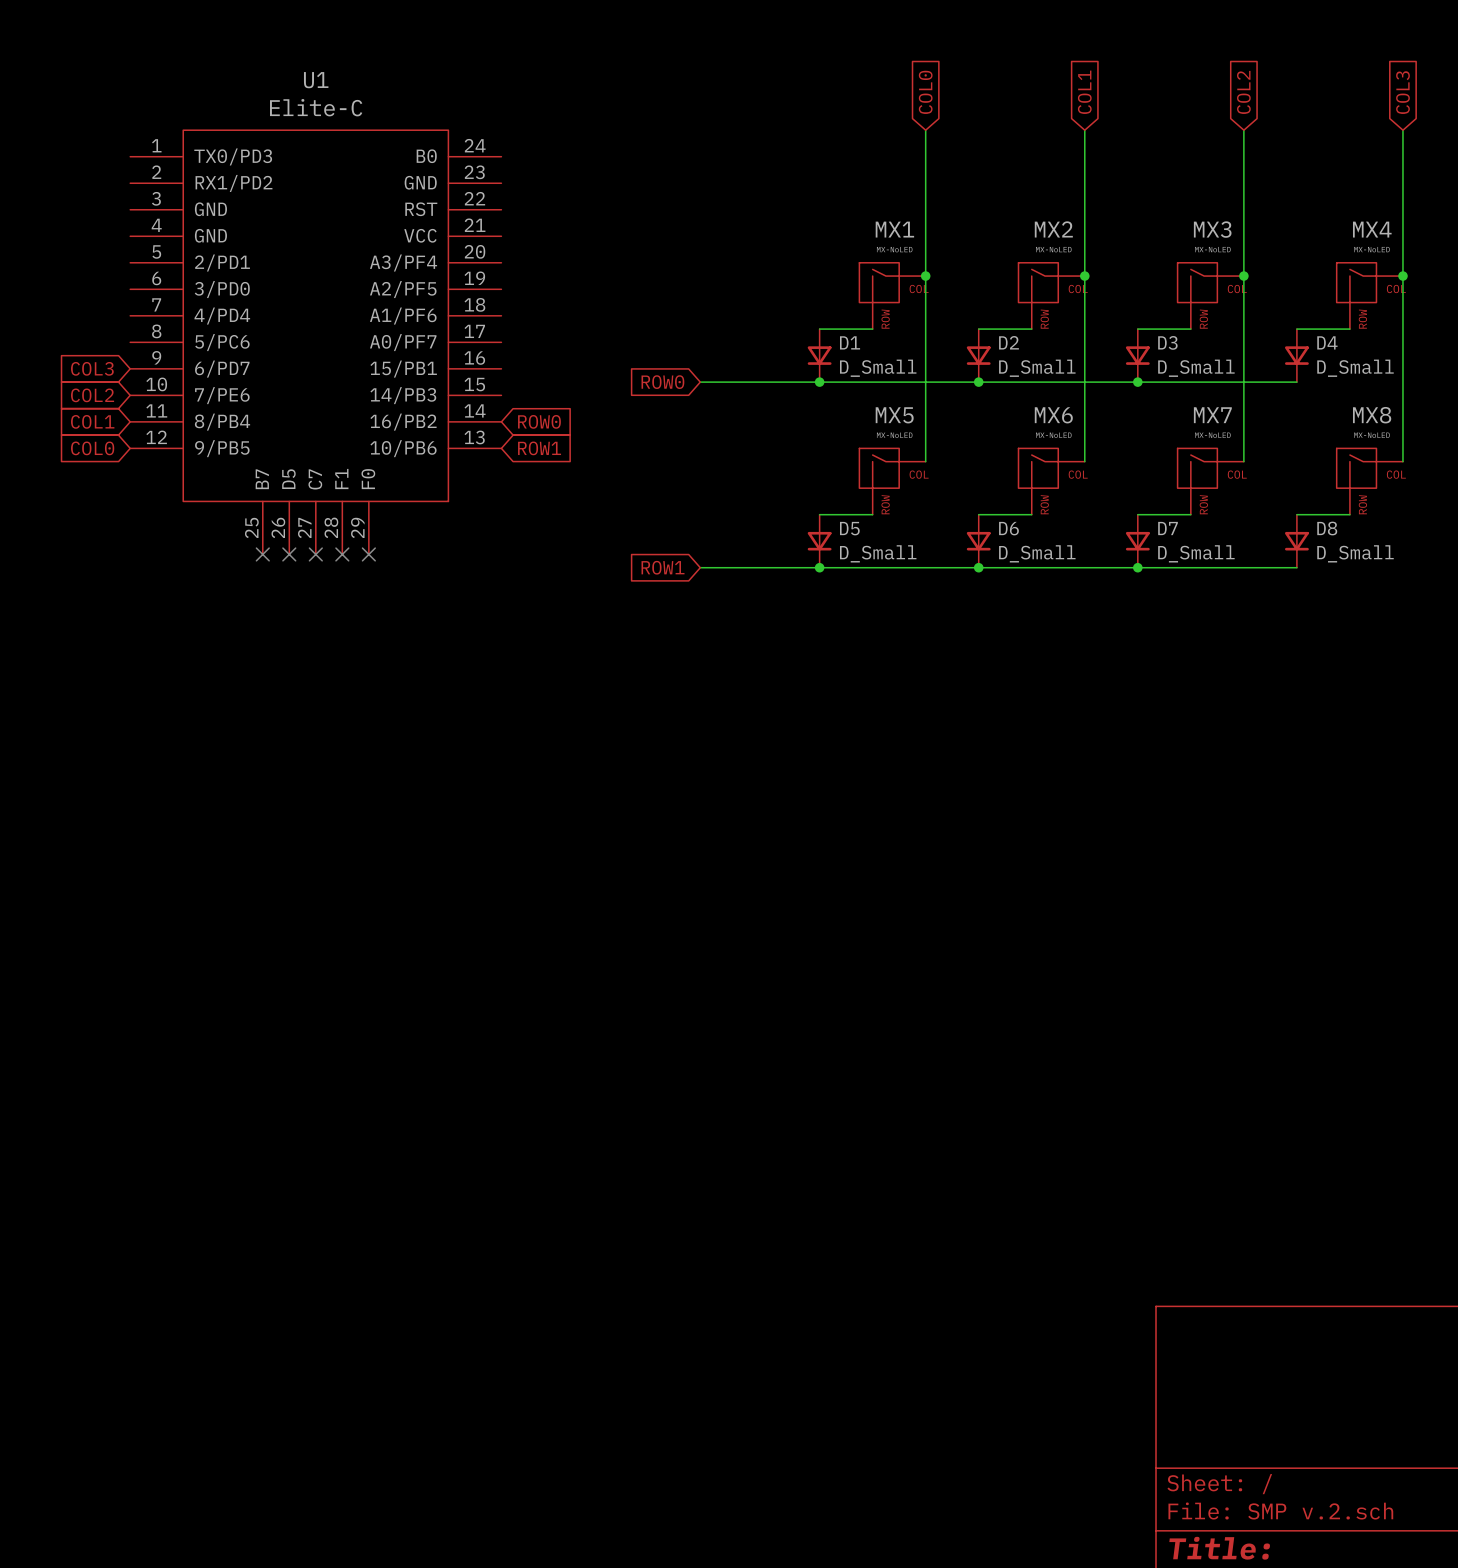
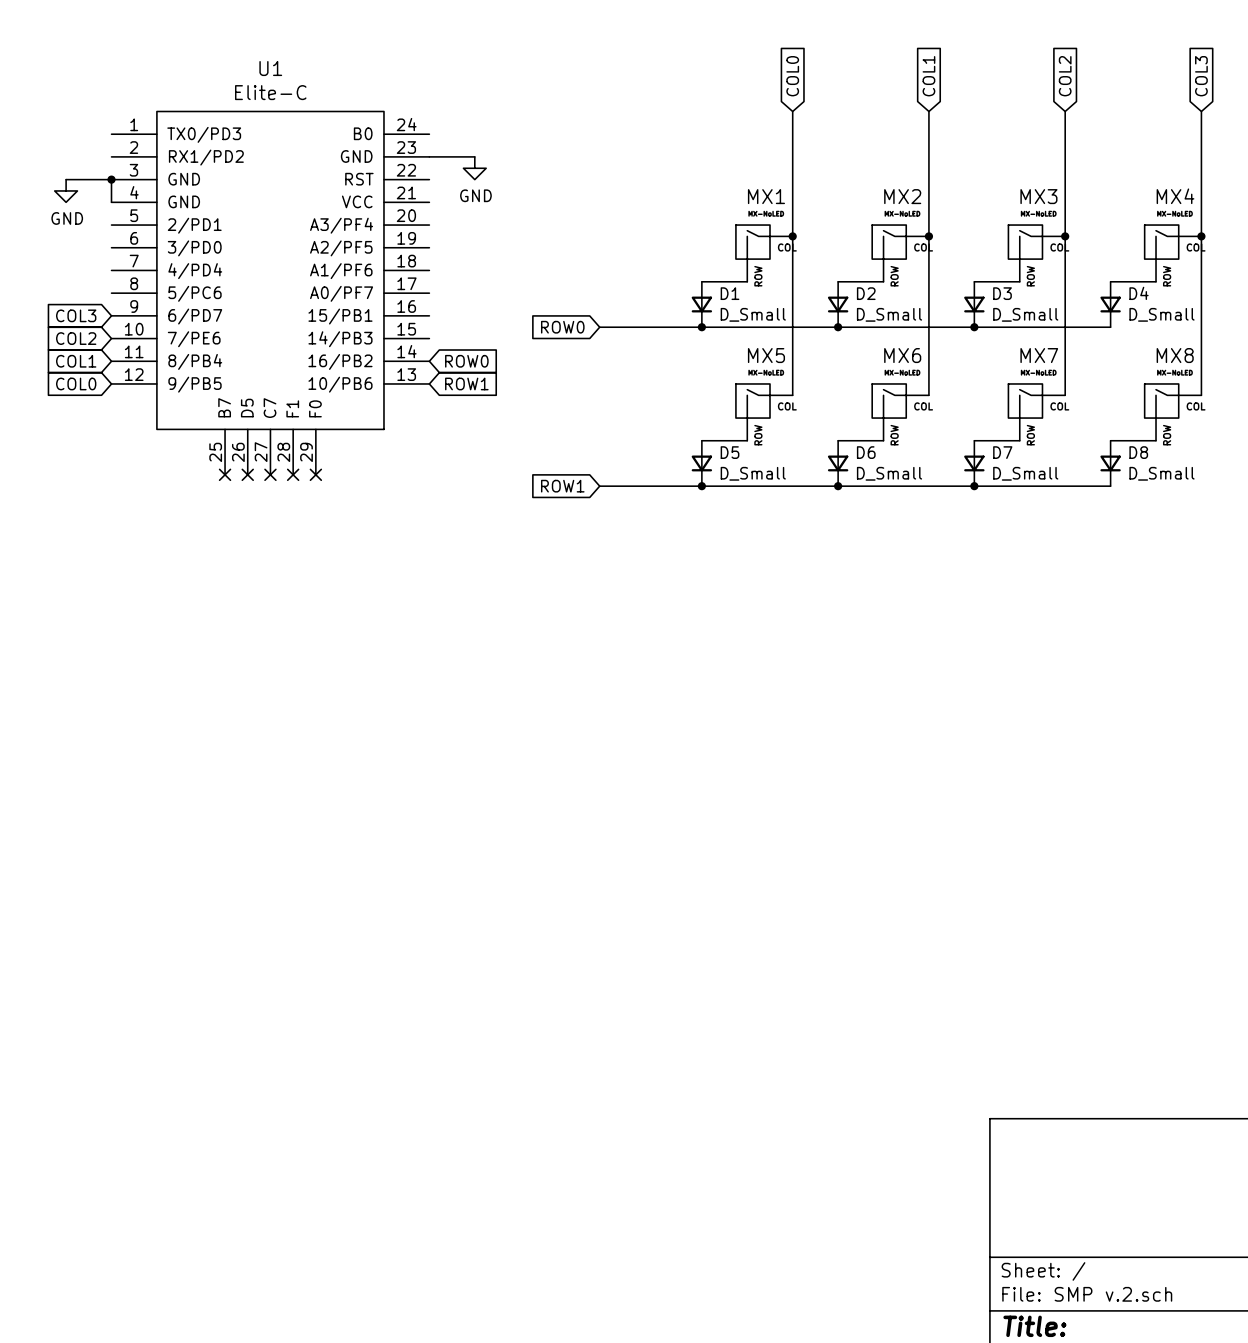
wire: none -> (429, 156) (474, 156)
power symbol: none -> GND (474, 168)
wire: none -> (66, 179) (111, 179) (111, 202)
junction: none -> (111, 179)
power symbol: none -> GND (66, 190)

